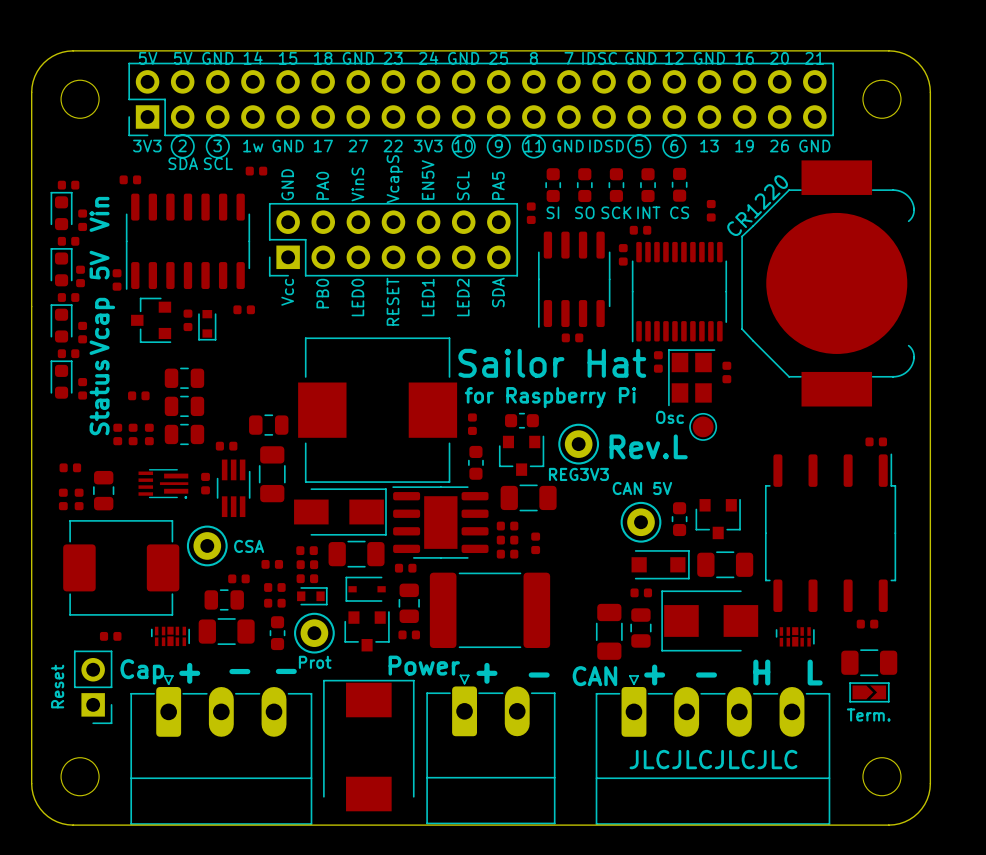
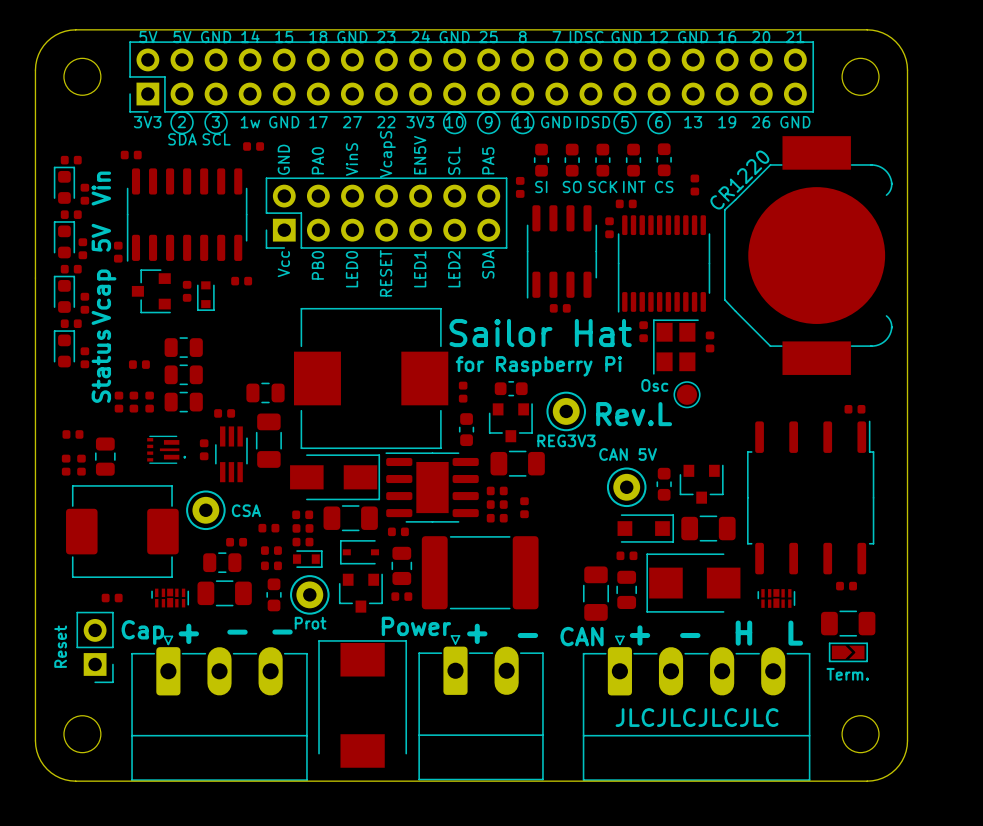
part footprint: [138, 469, 189, 499] -> [147, 435, 187, 464]

